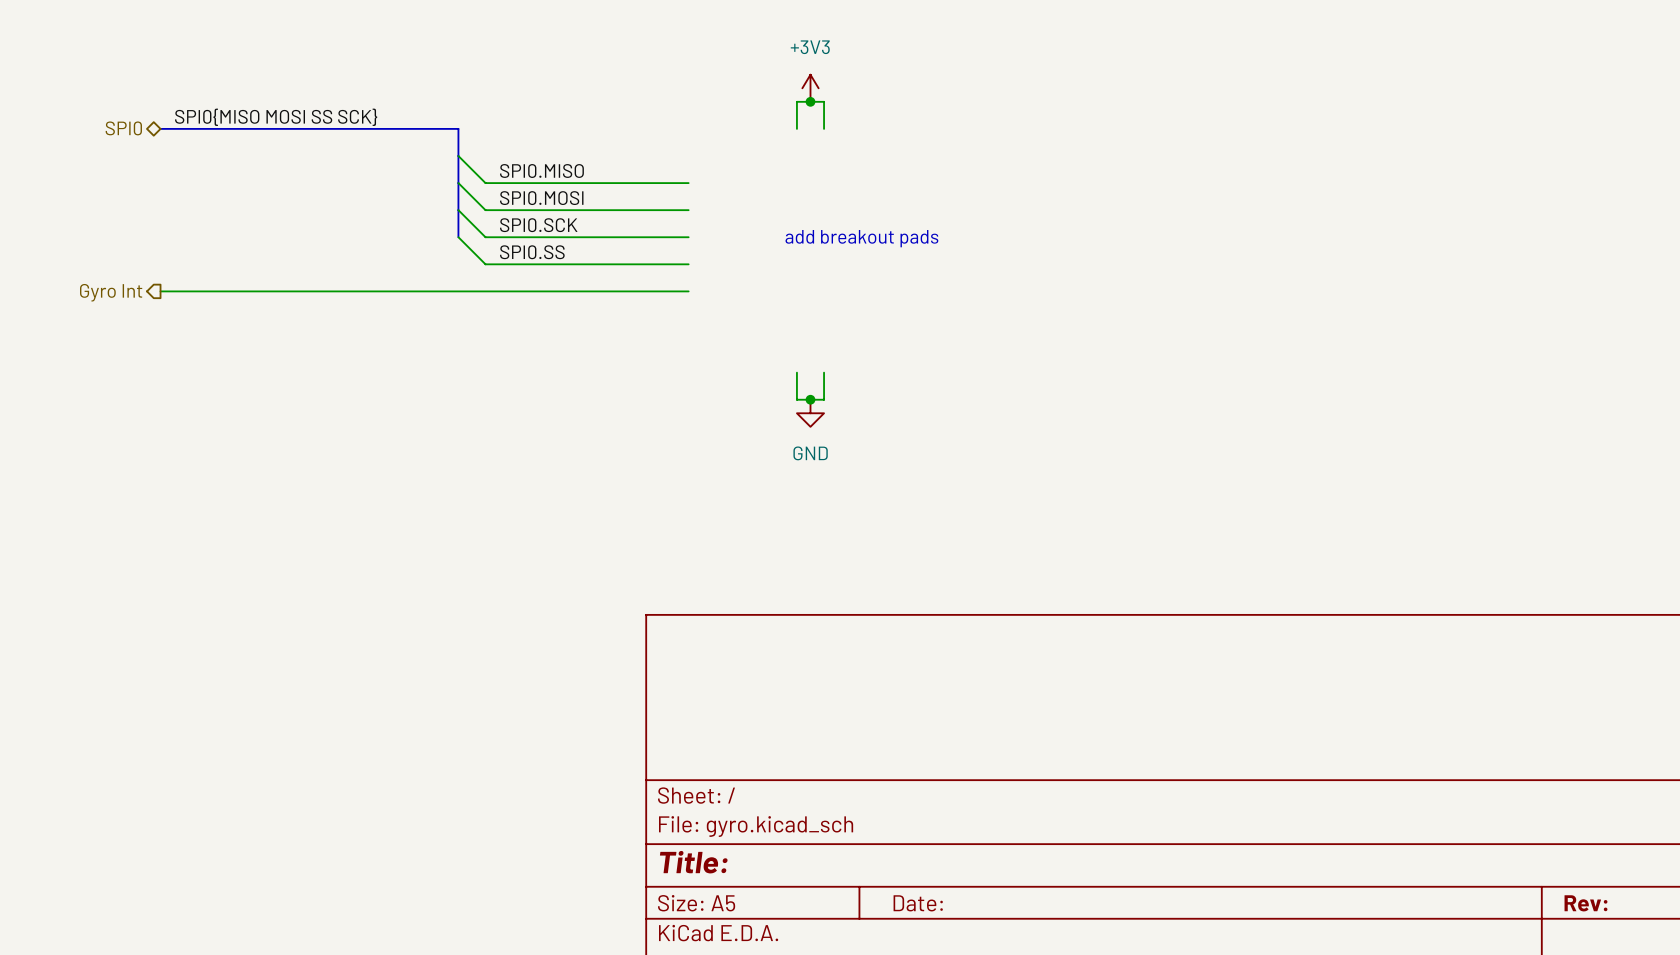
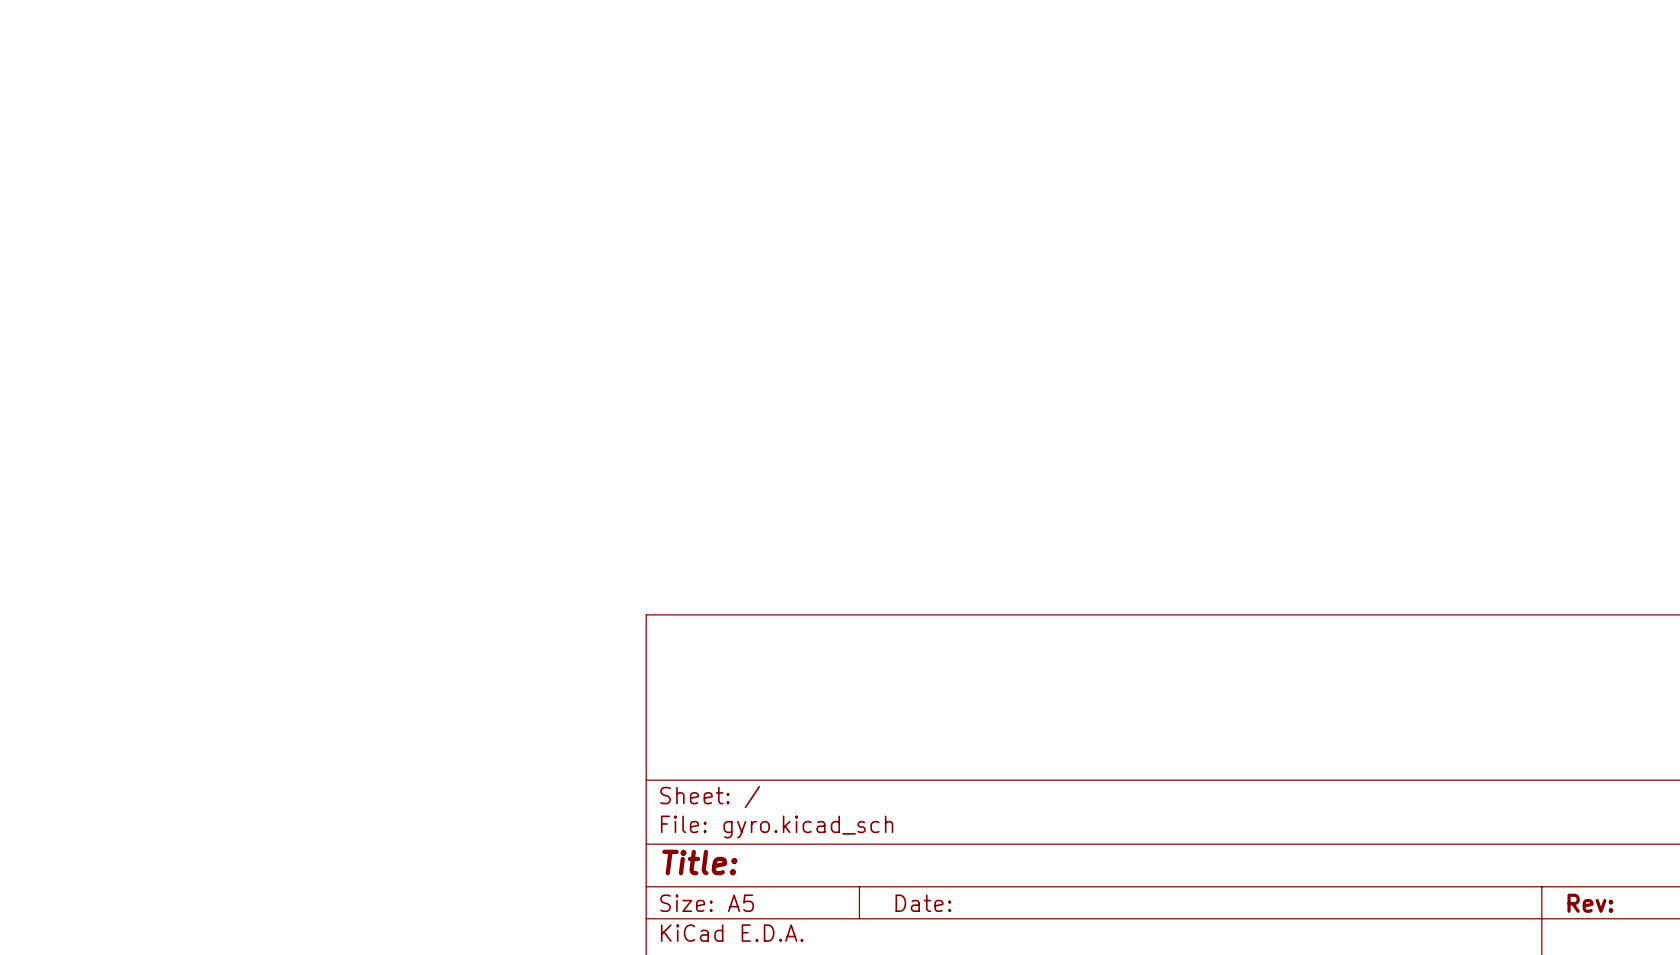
power symbol: +3V3 (810, 88) -> none
junction: (810, 101) -> none
label: SPI0{MISO MOSI SS SCK} (276, 117) -> none
hierarchical label: SPI0 (123, 128) -> none
bus: (160, 128) (458, 128) (458, 237) -> none
wire: (796, 128) (796, 101) (824, 101) (824, 128) -> none
wire: (458, 155) (485, 183) (688, 183) -> none
label: SPI0.MISO (541, 171) -> none
wire: (458, 183) (485, 210) (688, 210) -> none
label: SPI0.MOSI (541, 198) -> none
wire: (458, 210) (485, 237) (688, 237) -> none
label: SPI0.SCK (538, 225) -> none
wire: (458, 237) (485, 264) (688, 264) -> none
text: add breakout pads (861, 238) -> none
label: SPI0.SS (532, 252) -> none
wire: (160, 291) (688, 291) -> none
hierarchical label: Gyro Int (111, 292) -> none
wire: (796, 372) (796, 399) (824, 399) (824, 372) -> none
junction: (810, 399) -> none
power symbol: GND (810, 413) -> none

